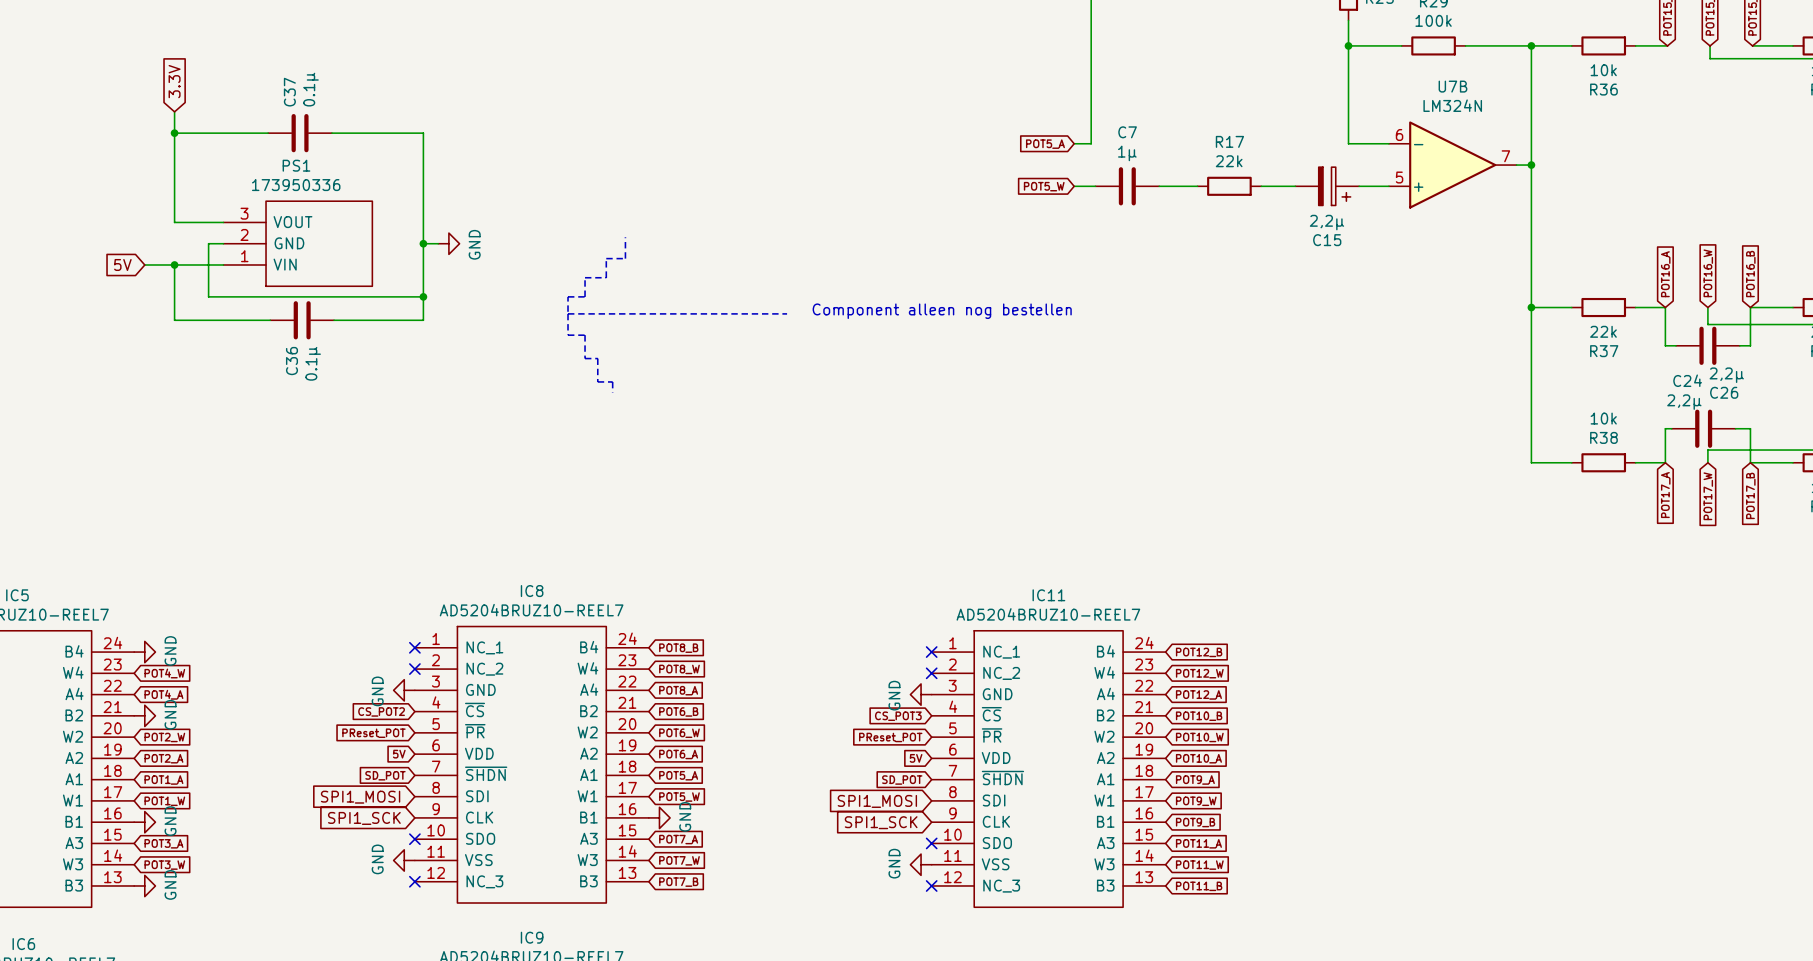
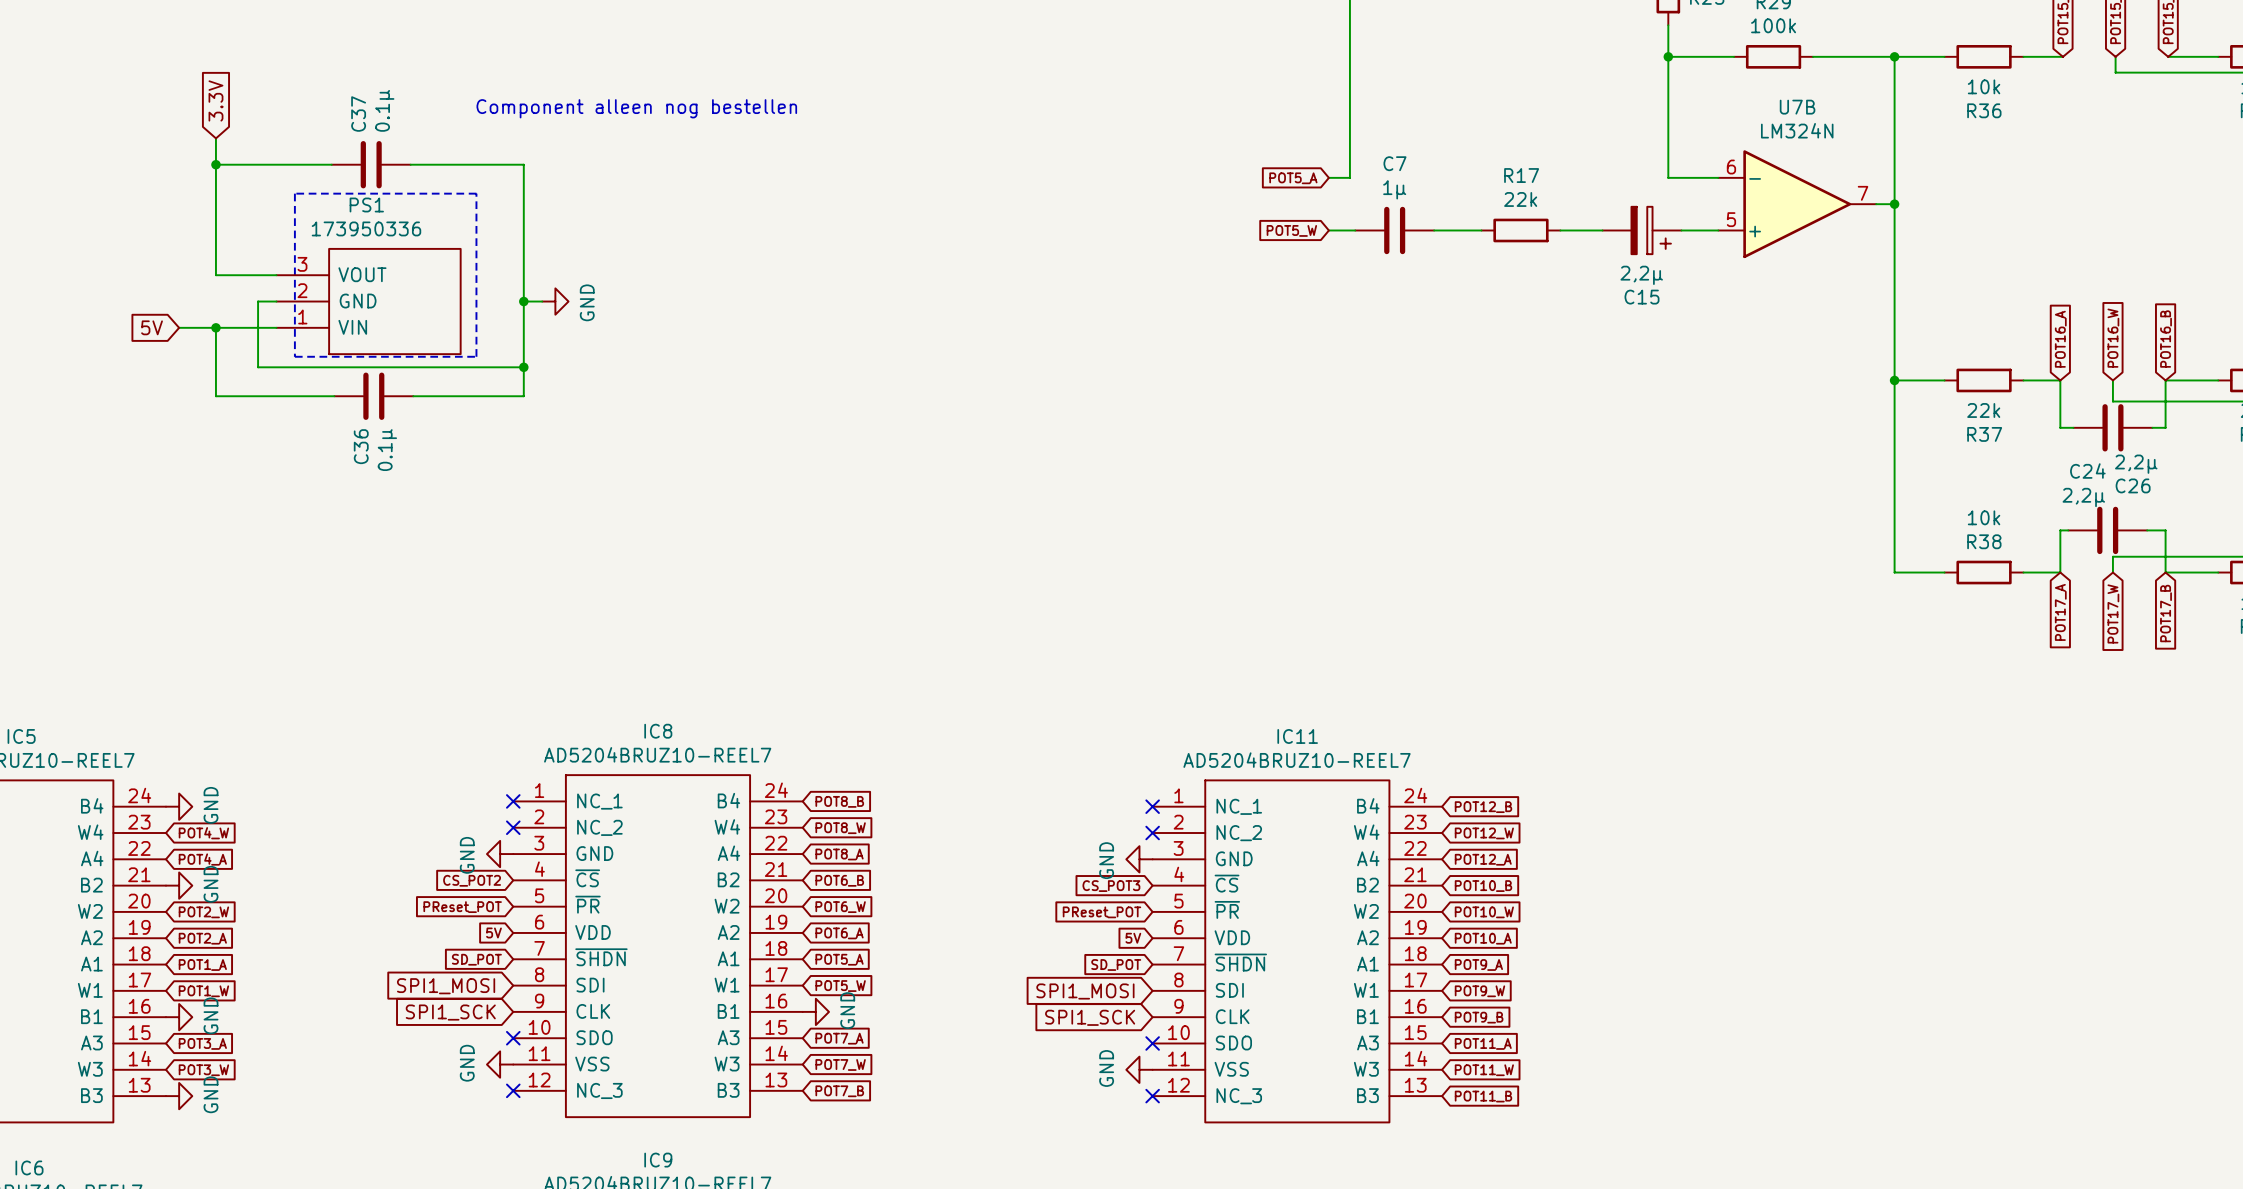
text: none -> Component alleen nog bestellen (636, 108)
line: none -> (294, 193) (476, 193) (476, 356) (294, 356) (294, 193)
line: (625, 237) (625, 258) (606, 258) (606, 277) (585, 277) (585, 296) (568, 296) (568, 311) -> none
text: Component alleen nog bestellen (942, 311) -> none
line: (787, 313) (568, 313) (568, 335) (585, 335) (585, 358) (597, 358) (597, 381) (612, 381) (612, 392) -> none

